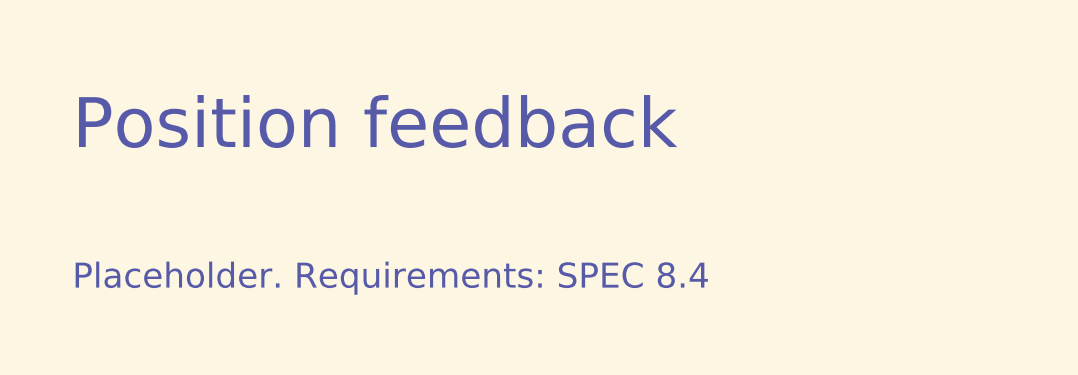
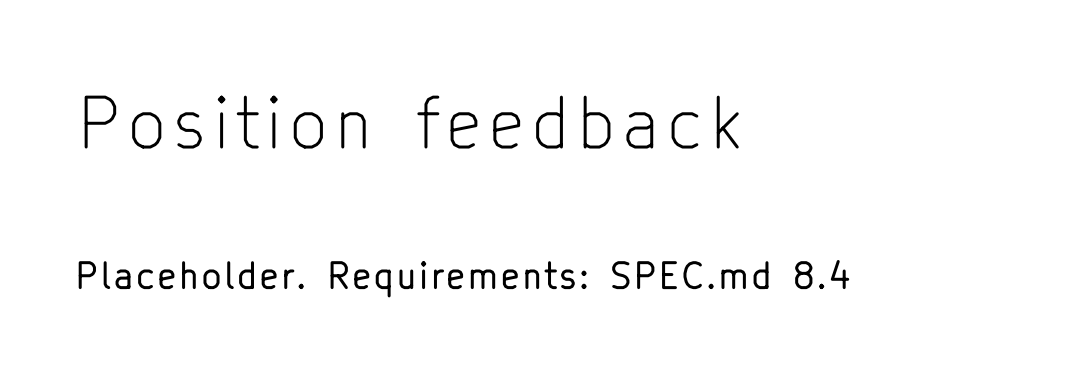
text: Placeholder. Requirements: SPEC 8.4 (391, 278) -> Placeholder. Requirements: SPEC.md 8.4 (463, 278)

